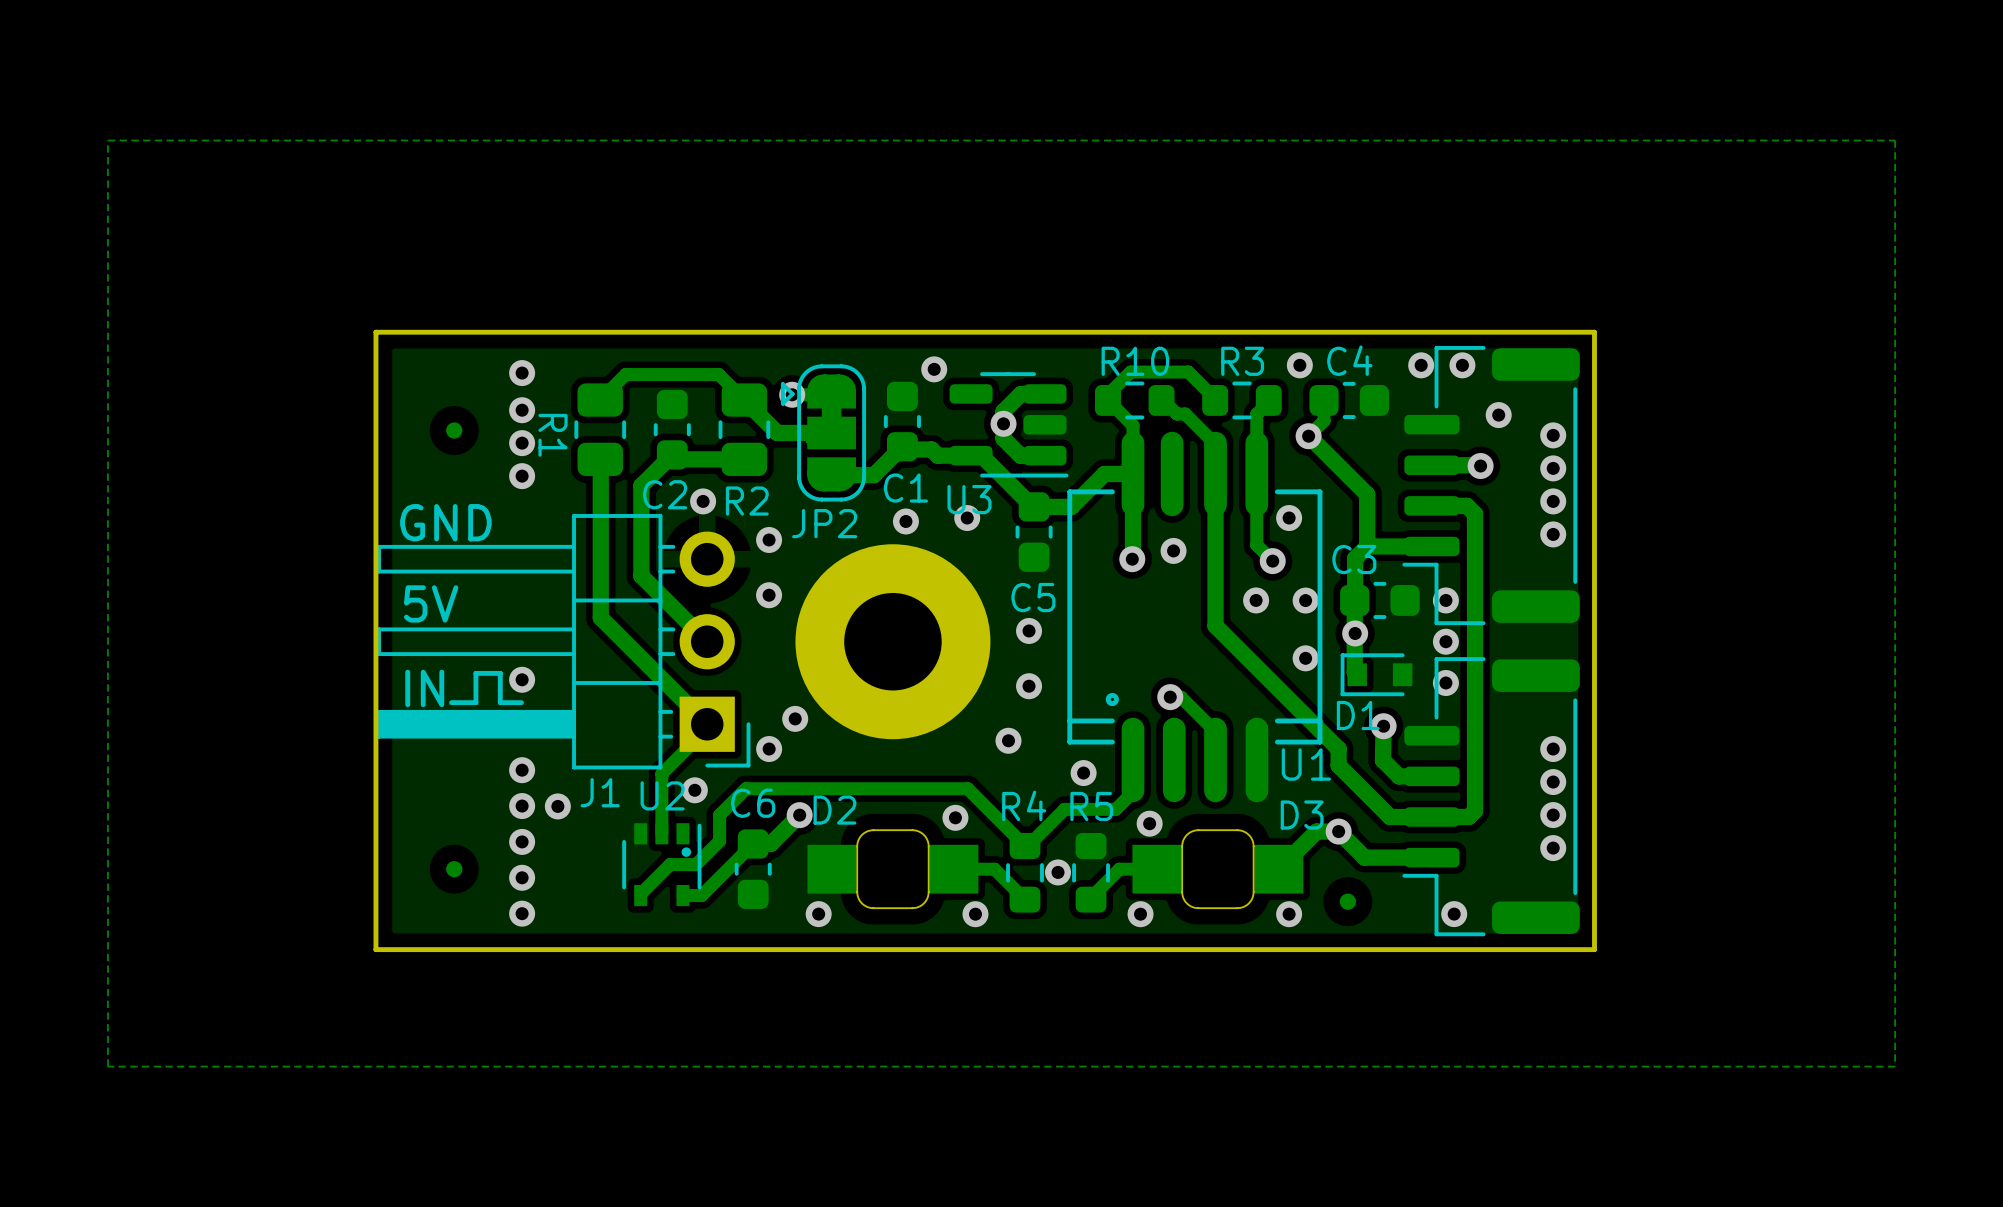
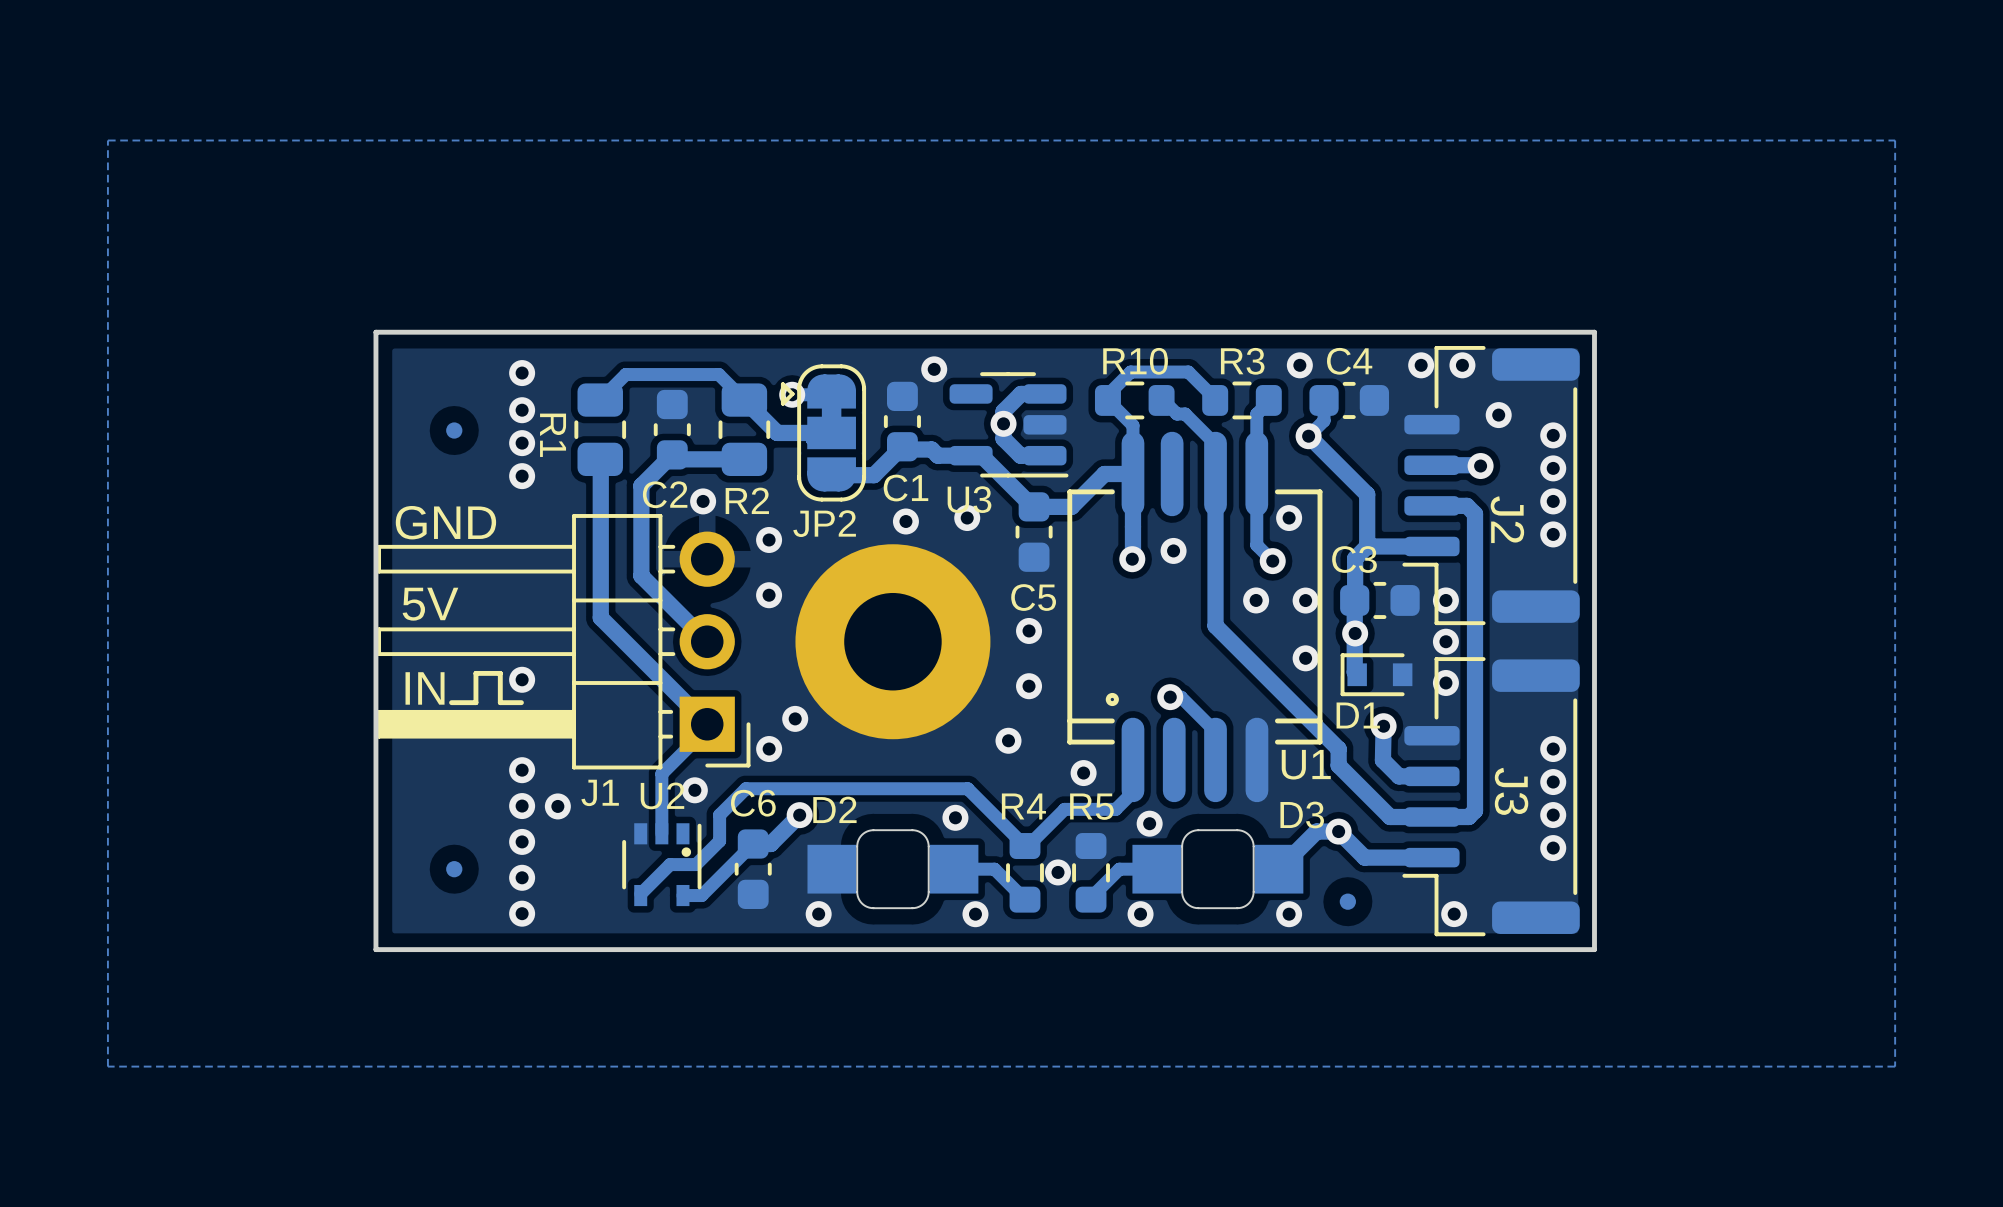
J2 name: none -> J2 (1507, 519)
J3 name: none -> J3 (1511, 791)

